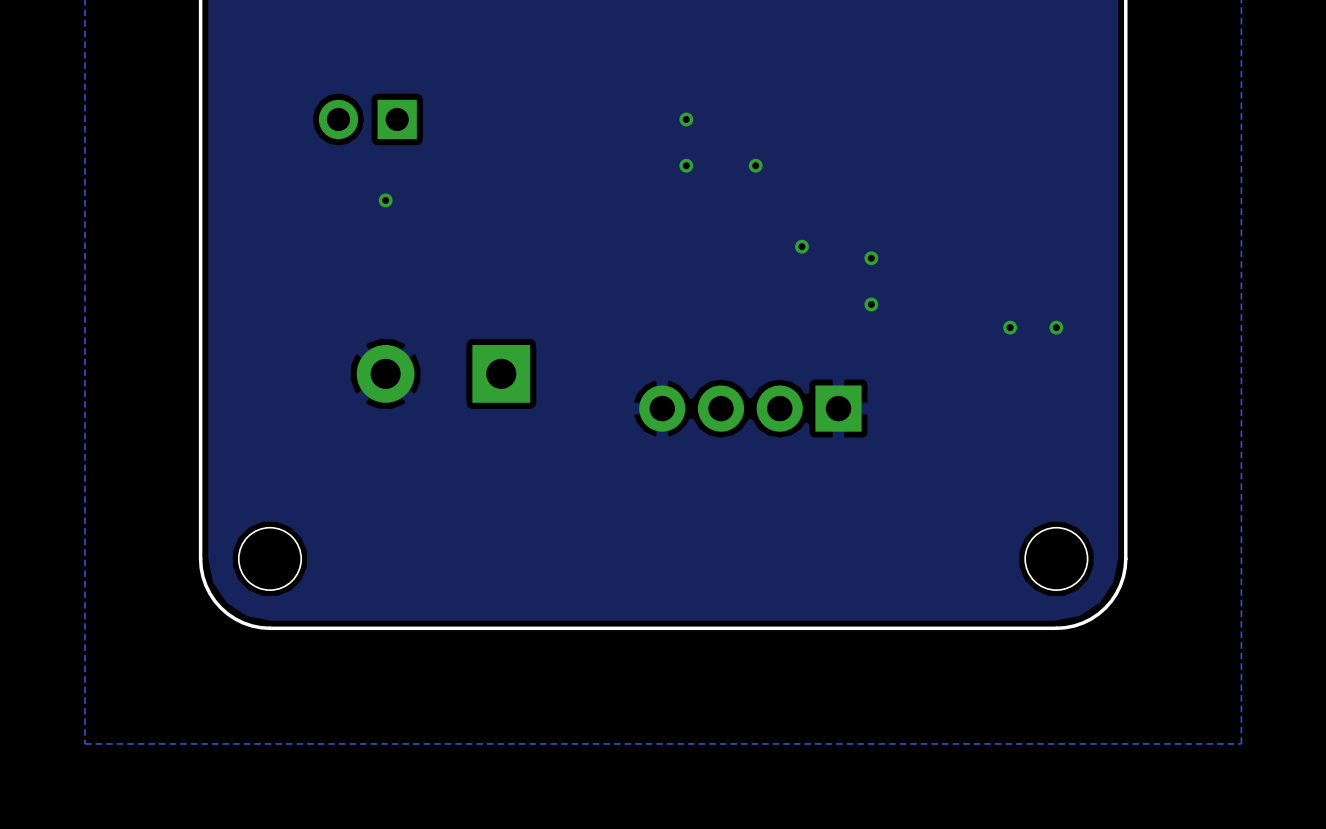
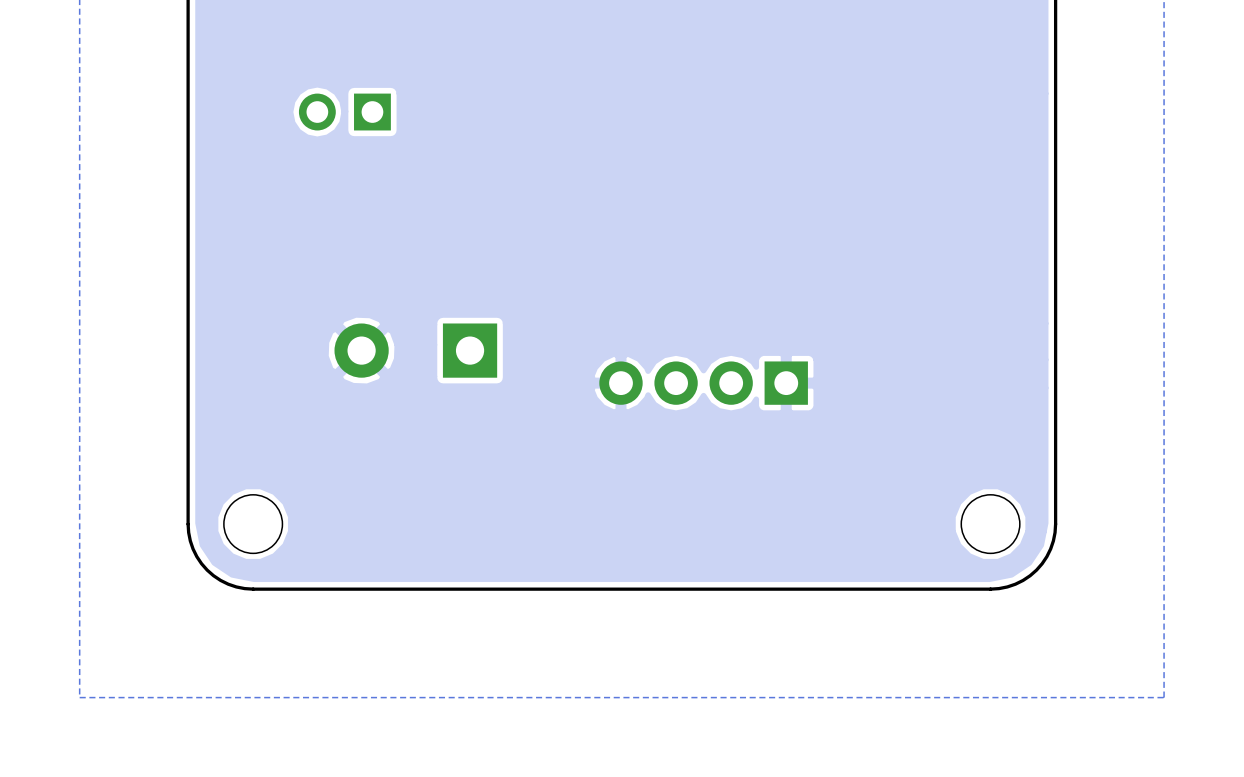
via: (686, 119) -> none
via: (686, 165) -> none
via: (755, 165) -> none
via: (385, 200) -> none
via: (801, 246) -> none
via: (871, 258) -> none
via: (871, 304) -> none
via: (1010, 327) -> none
via: (1056, 327) -> none

